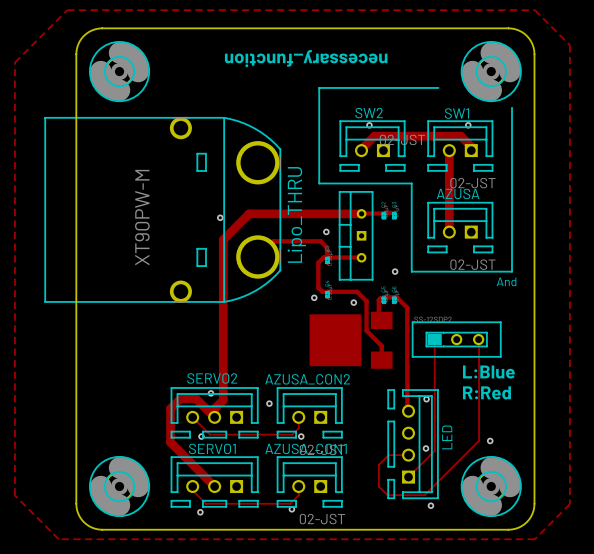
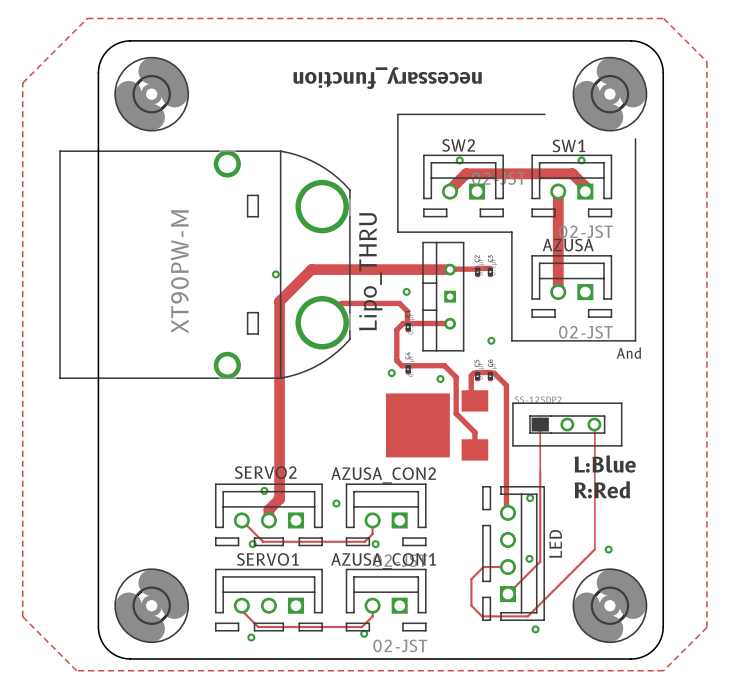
track: (214, 417) (195, 398) (180, 398) (170, 408) (170, 442) (214, 486) -> none

